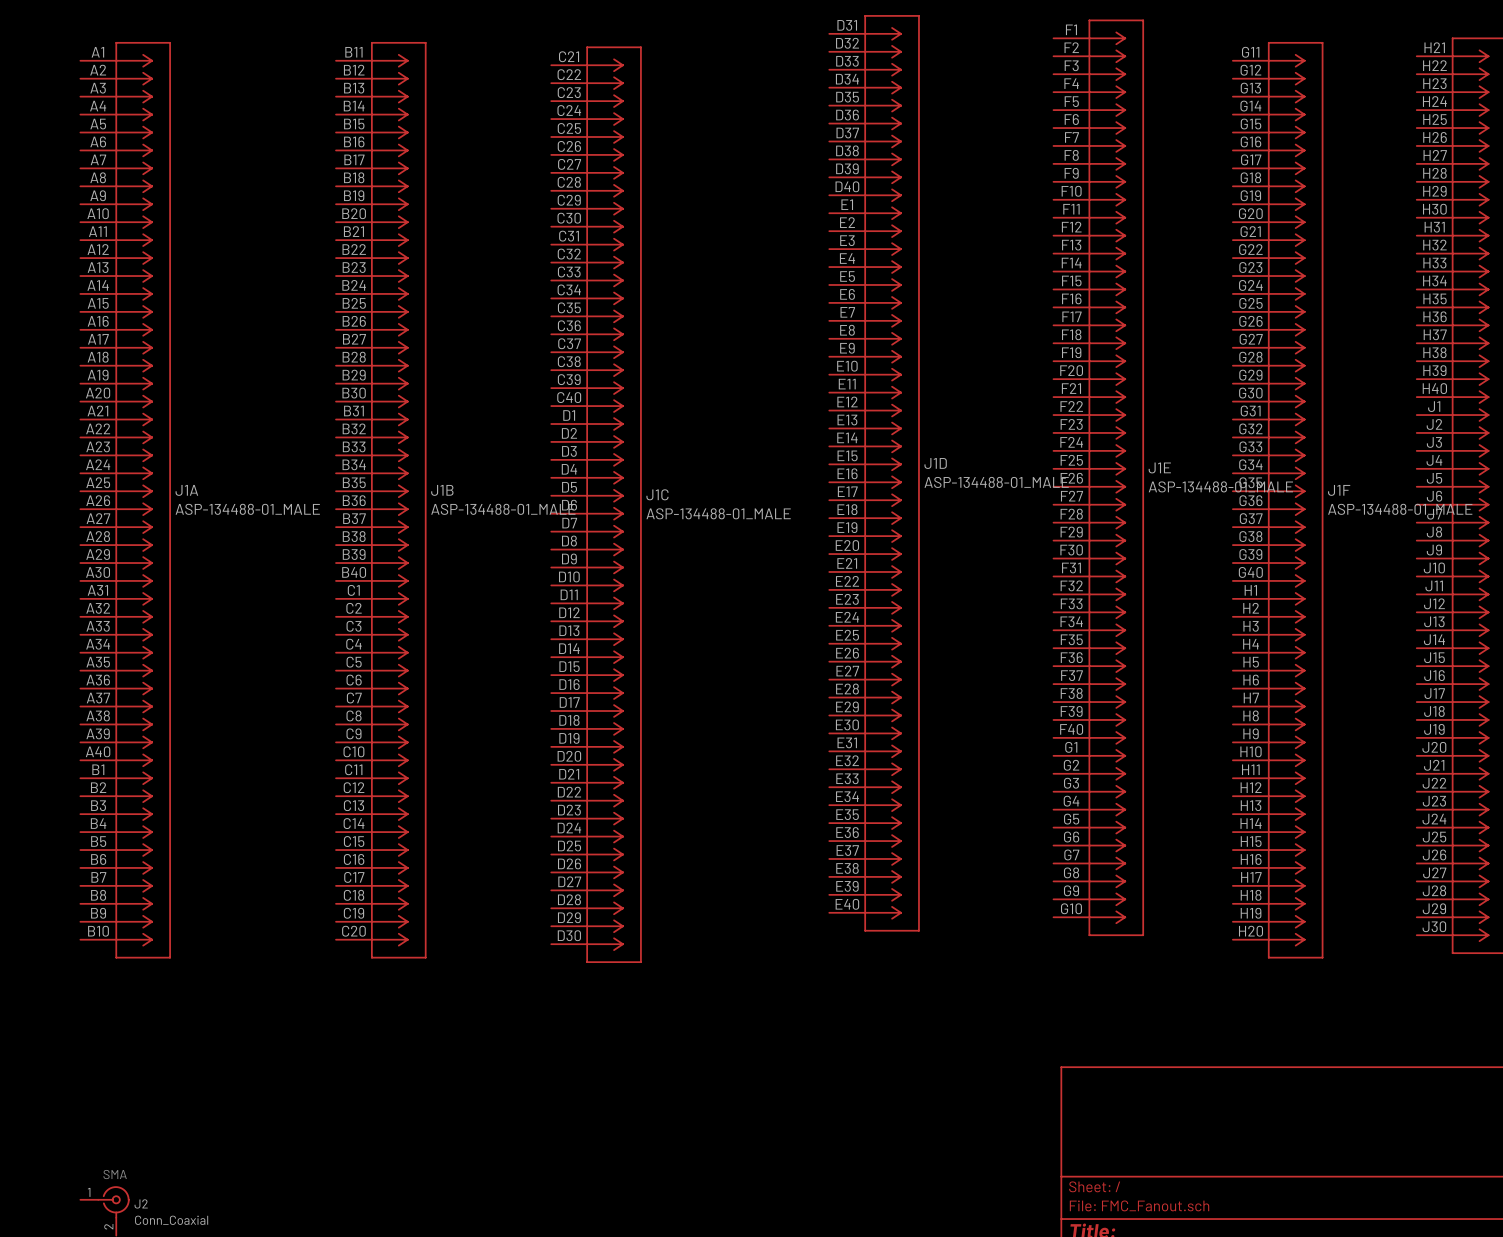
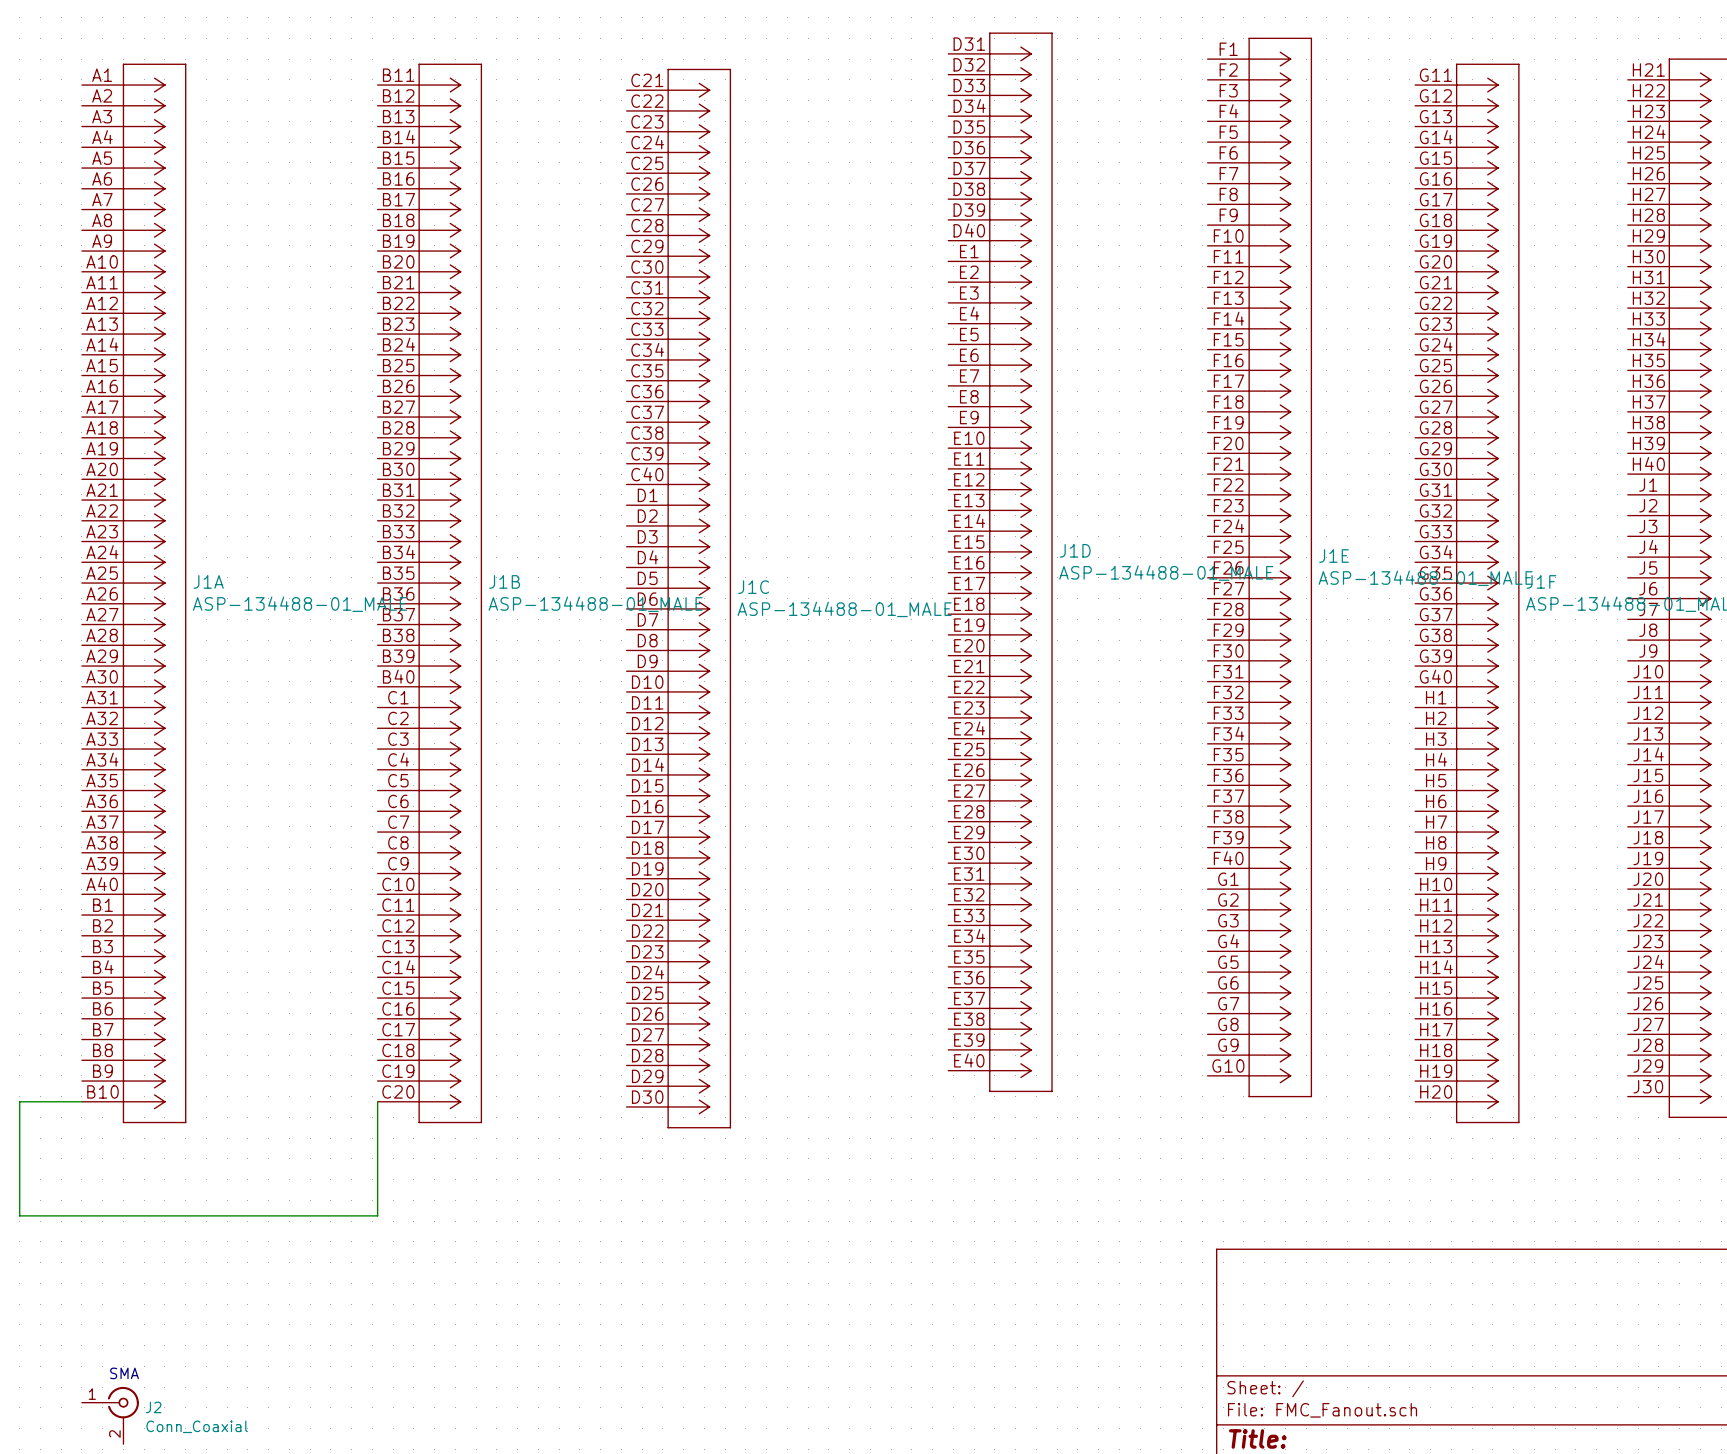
wire: none -> (81, 1101) (19, 1101) (19, 1215) (377, 1215) (377, 1101)

